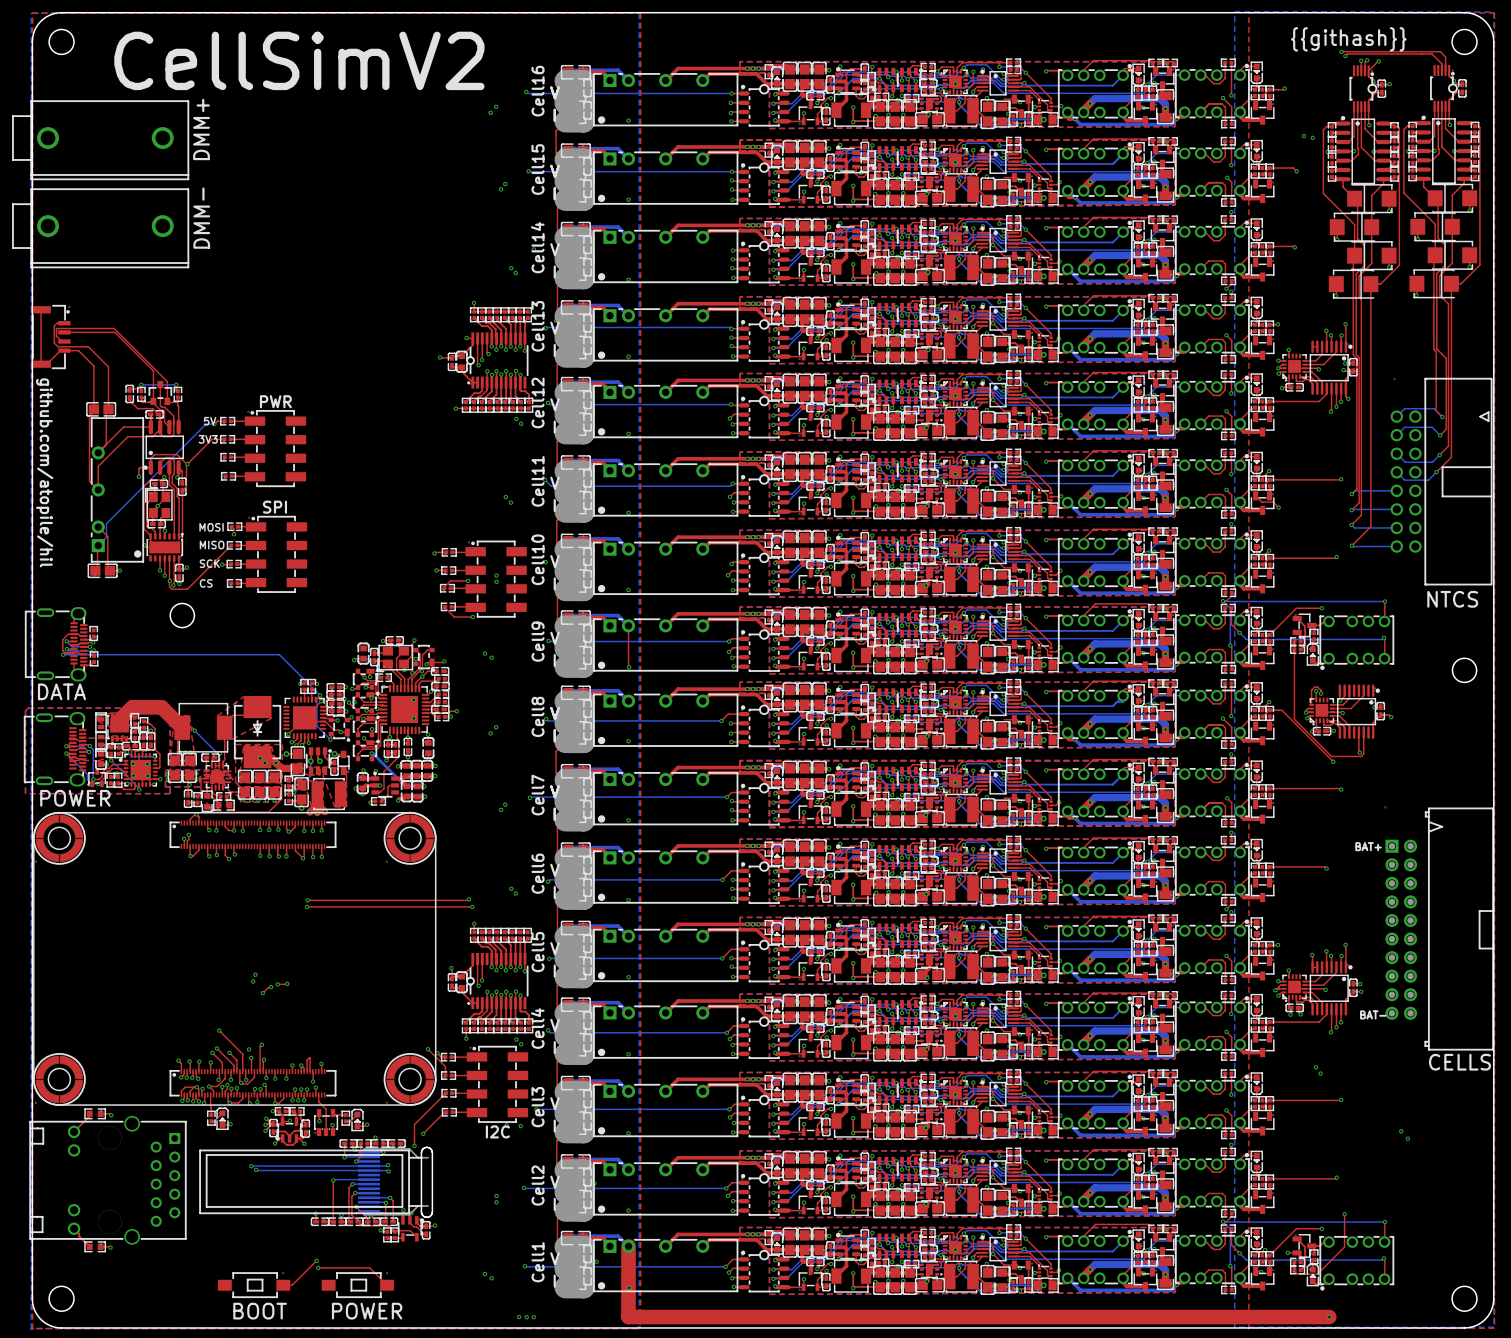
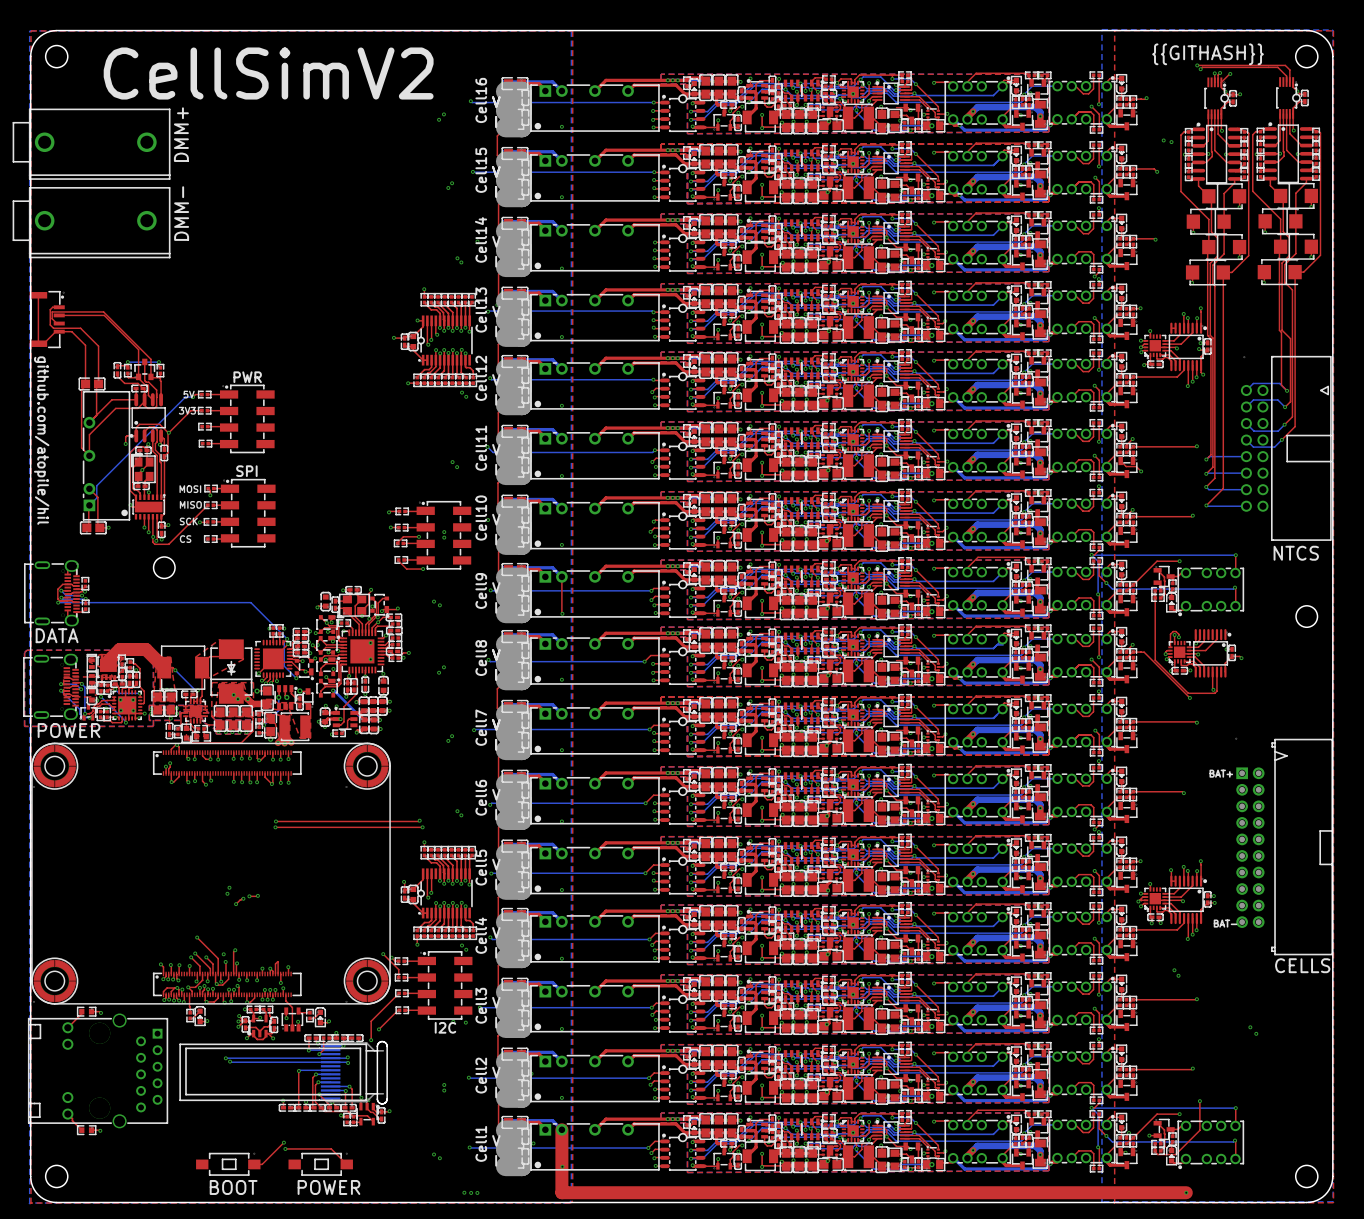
text: {{githash}} (1348, 39) -> {{GITHASH}} (1208, 54)

